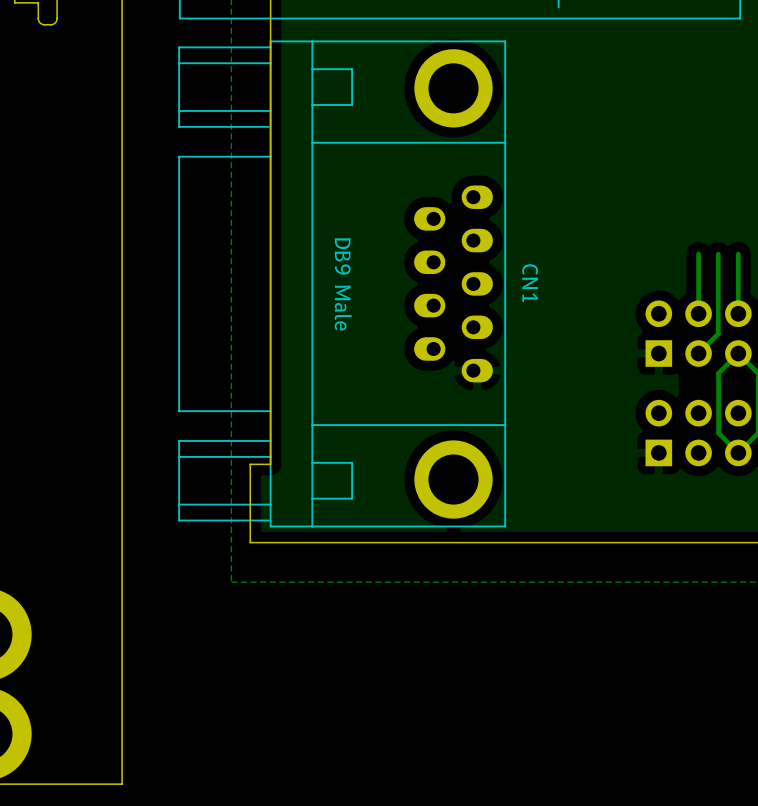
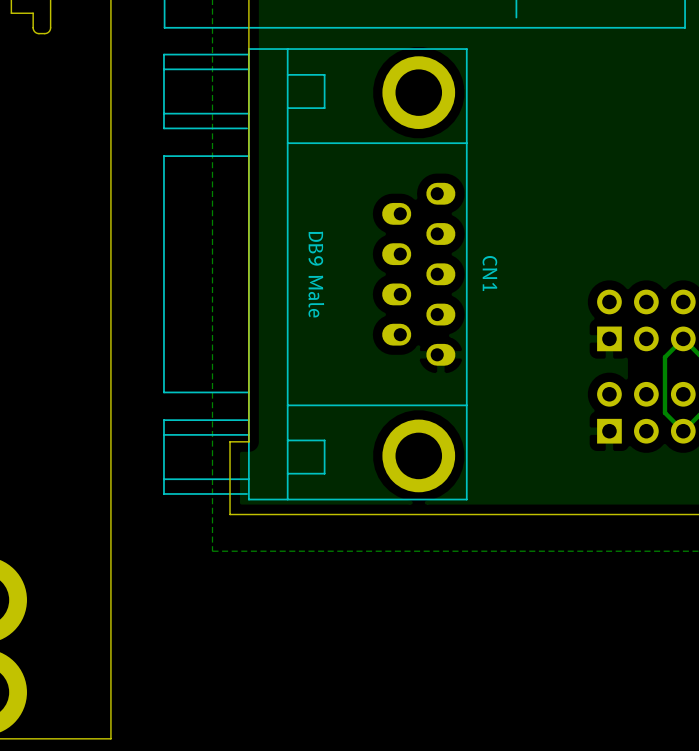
track: (698, 254) (698, 313) -> none
track: (718, 254) (718, 333) (698, 353) -> none
track: (738, 254) (738, 313) -> none

